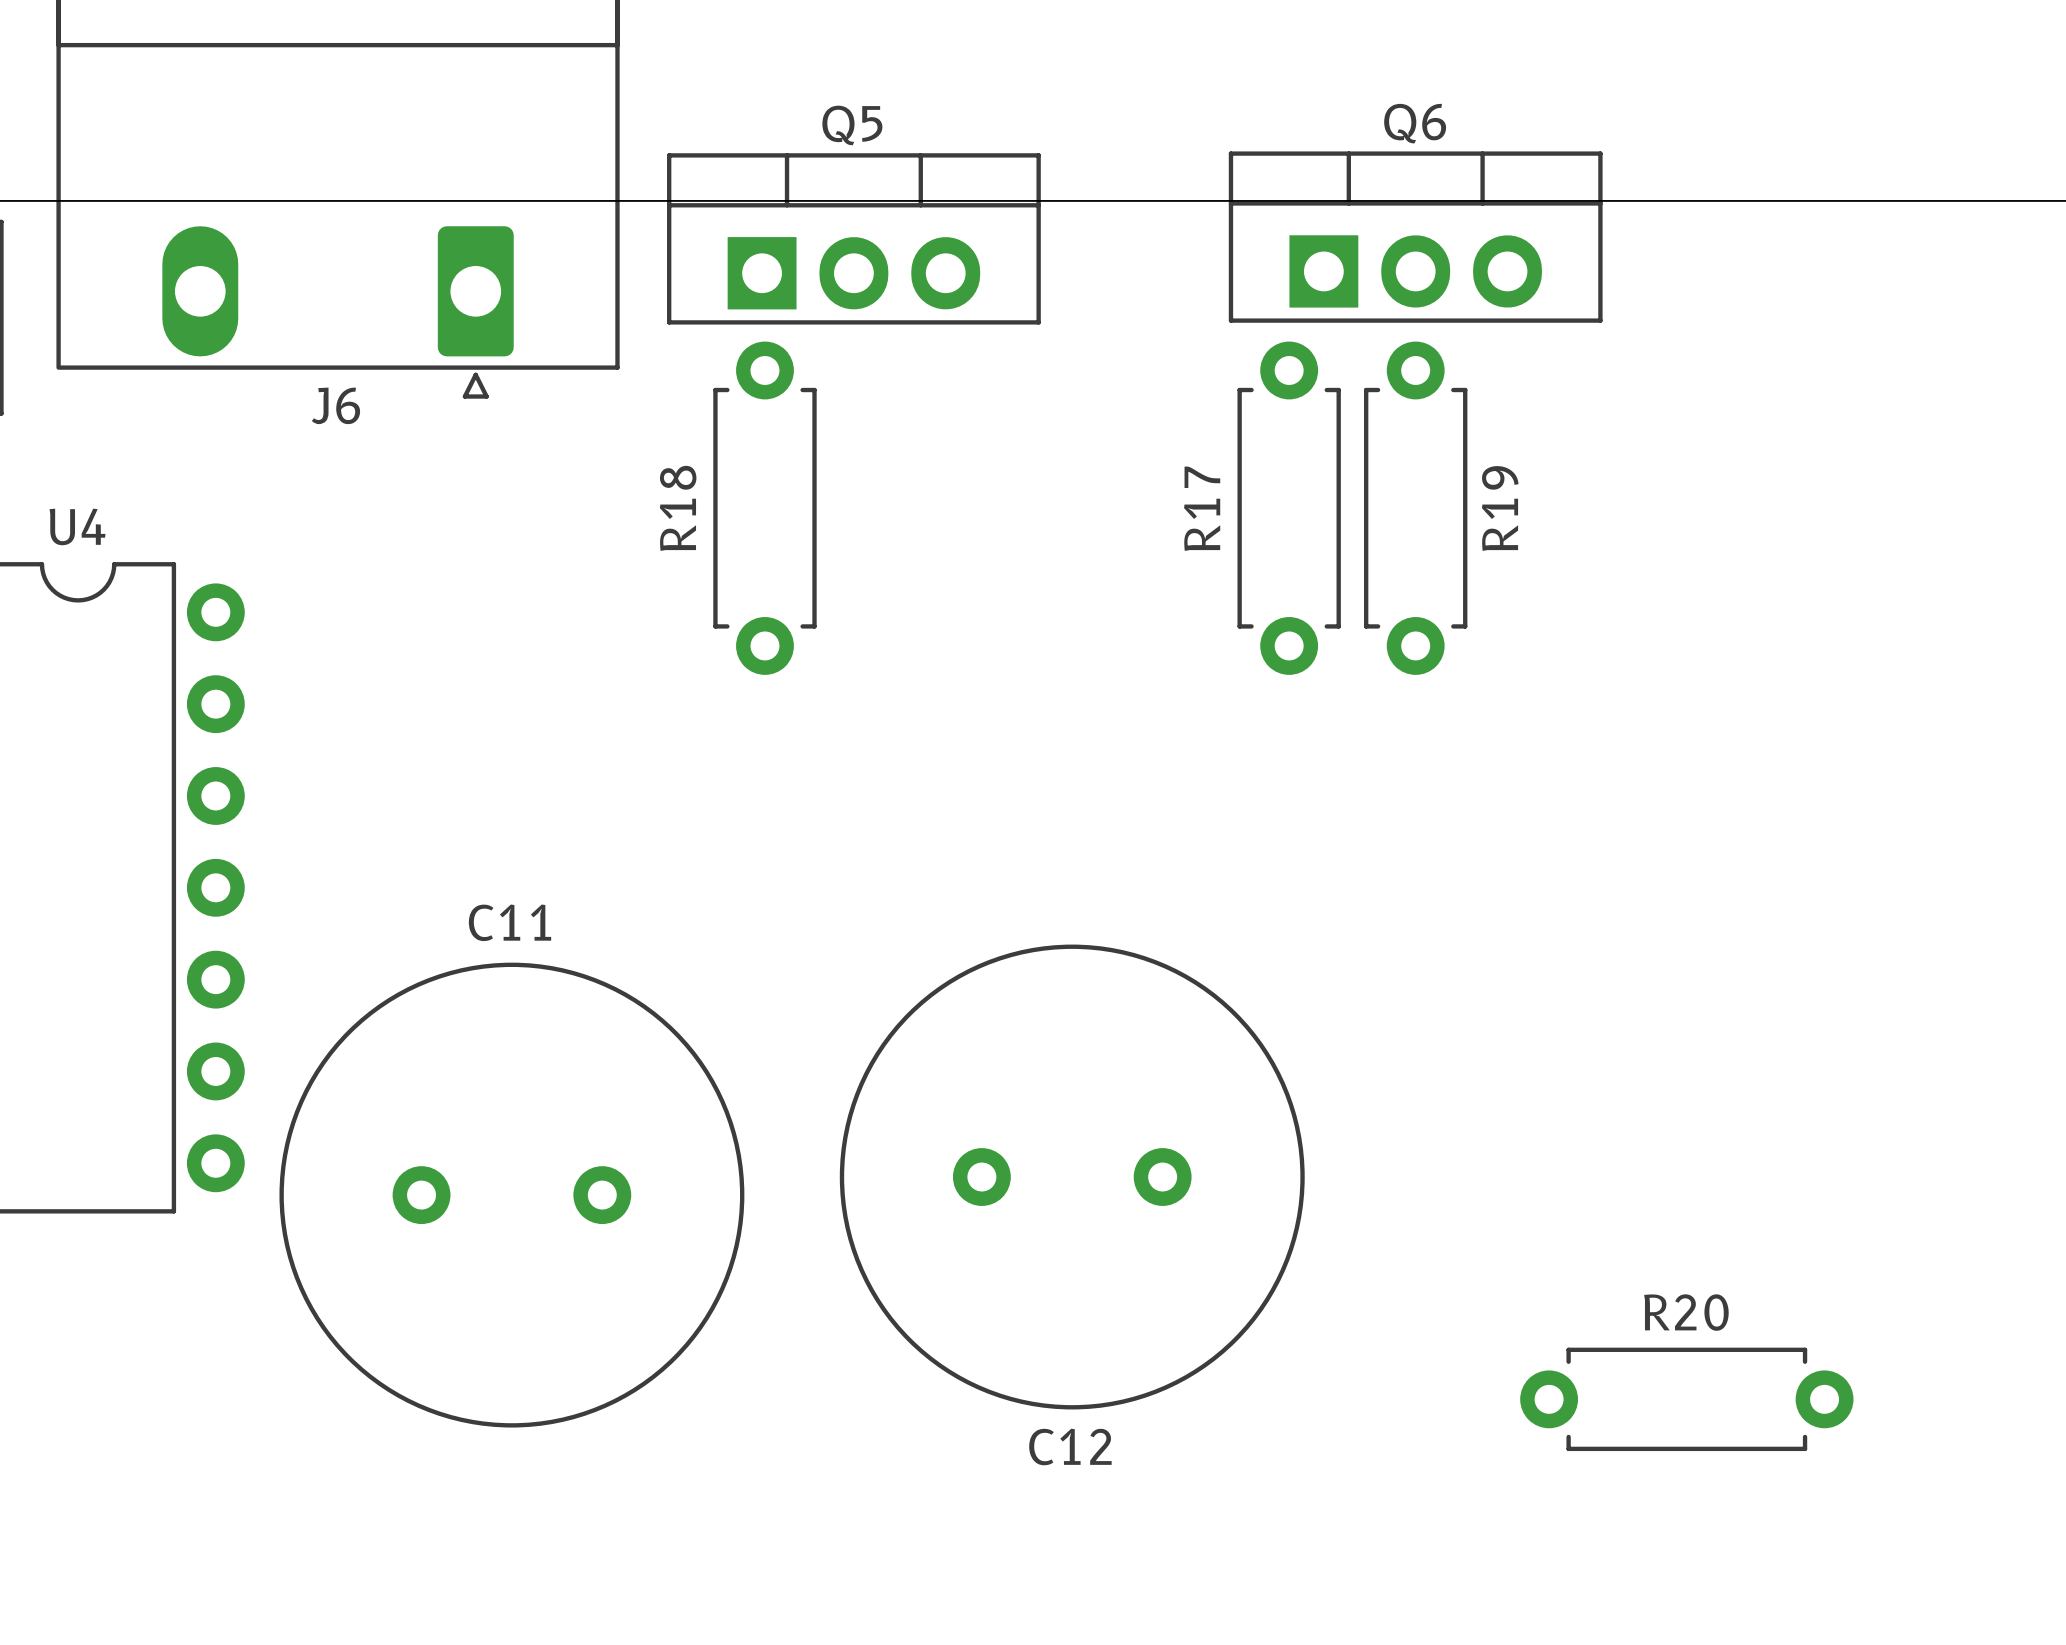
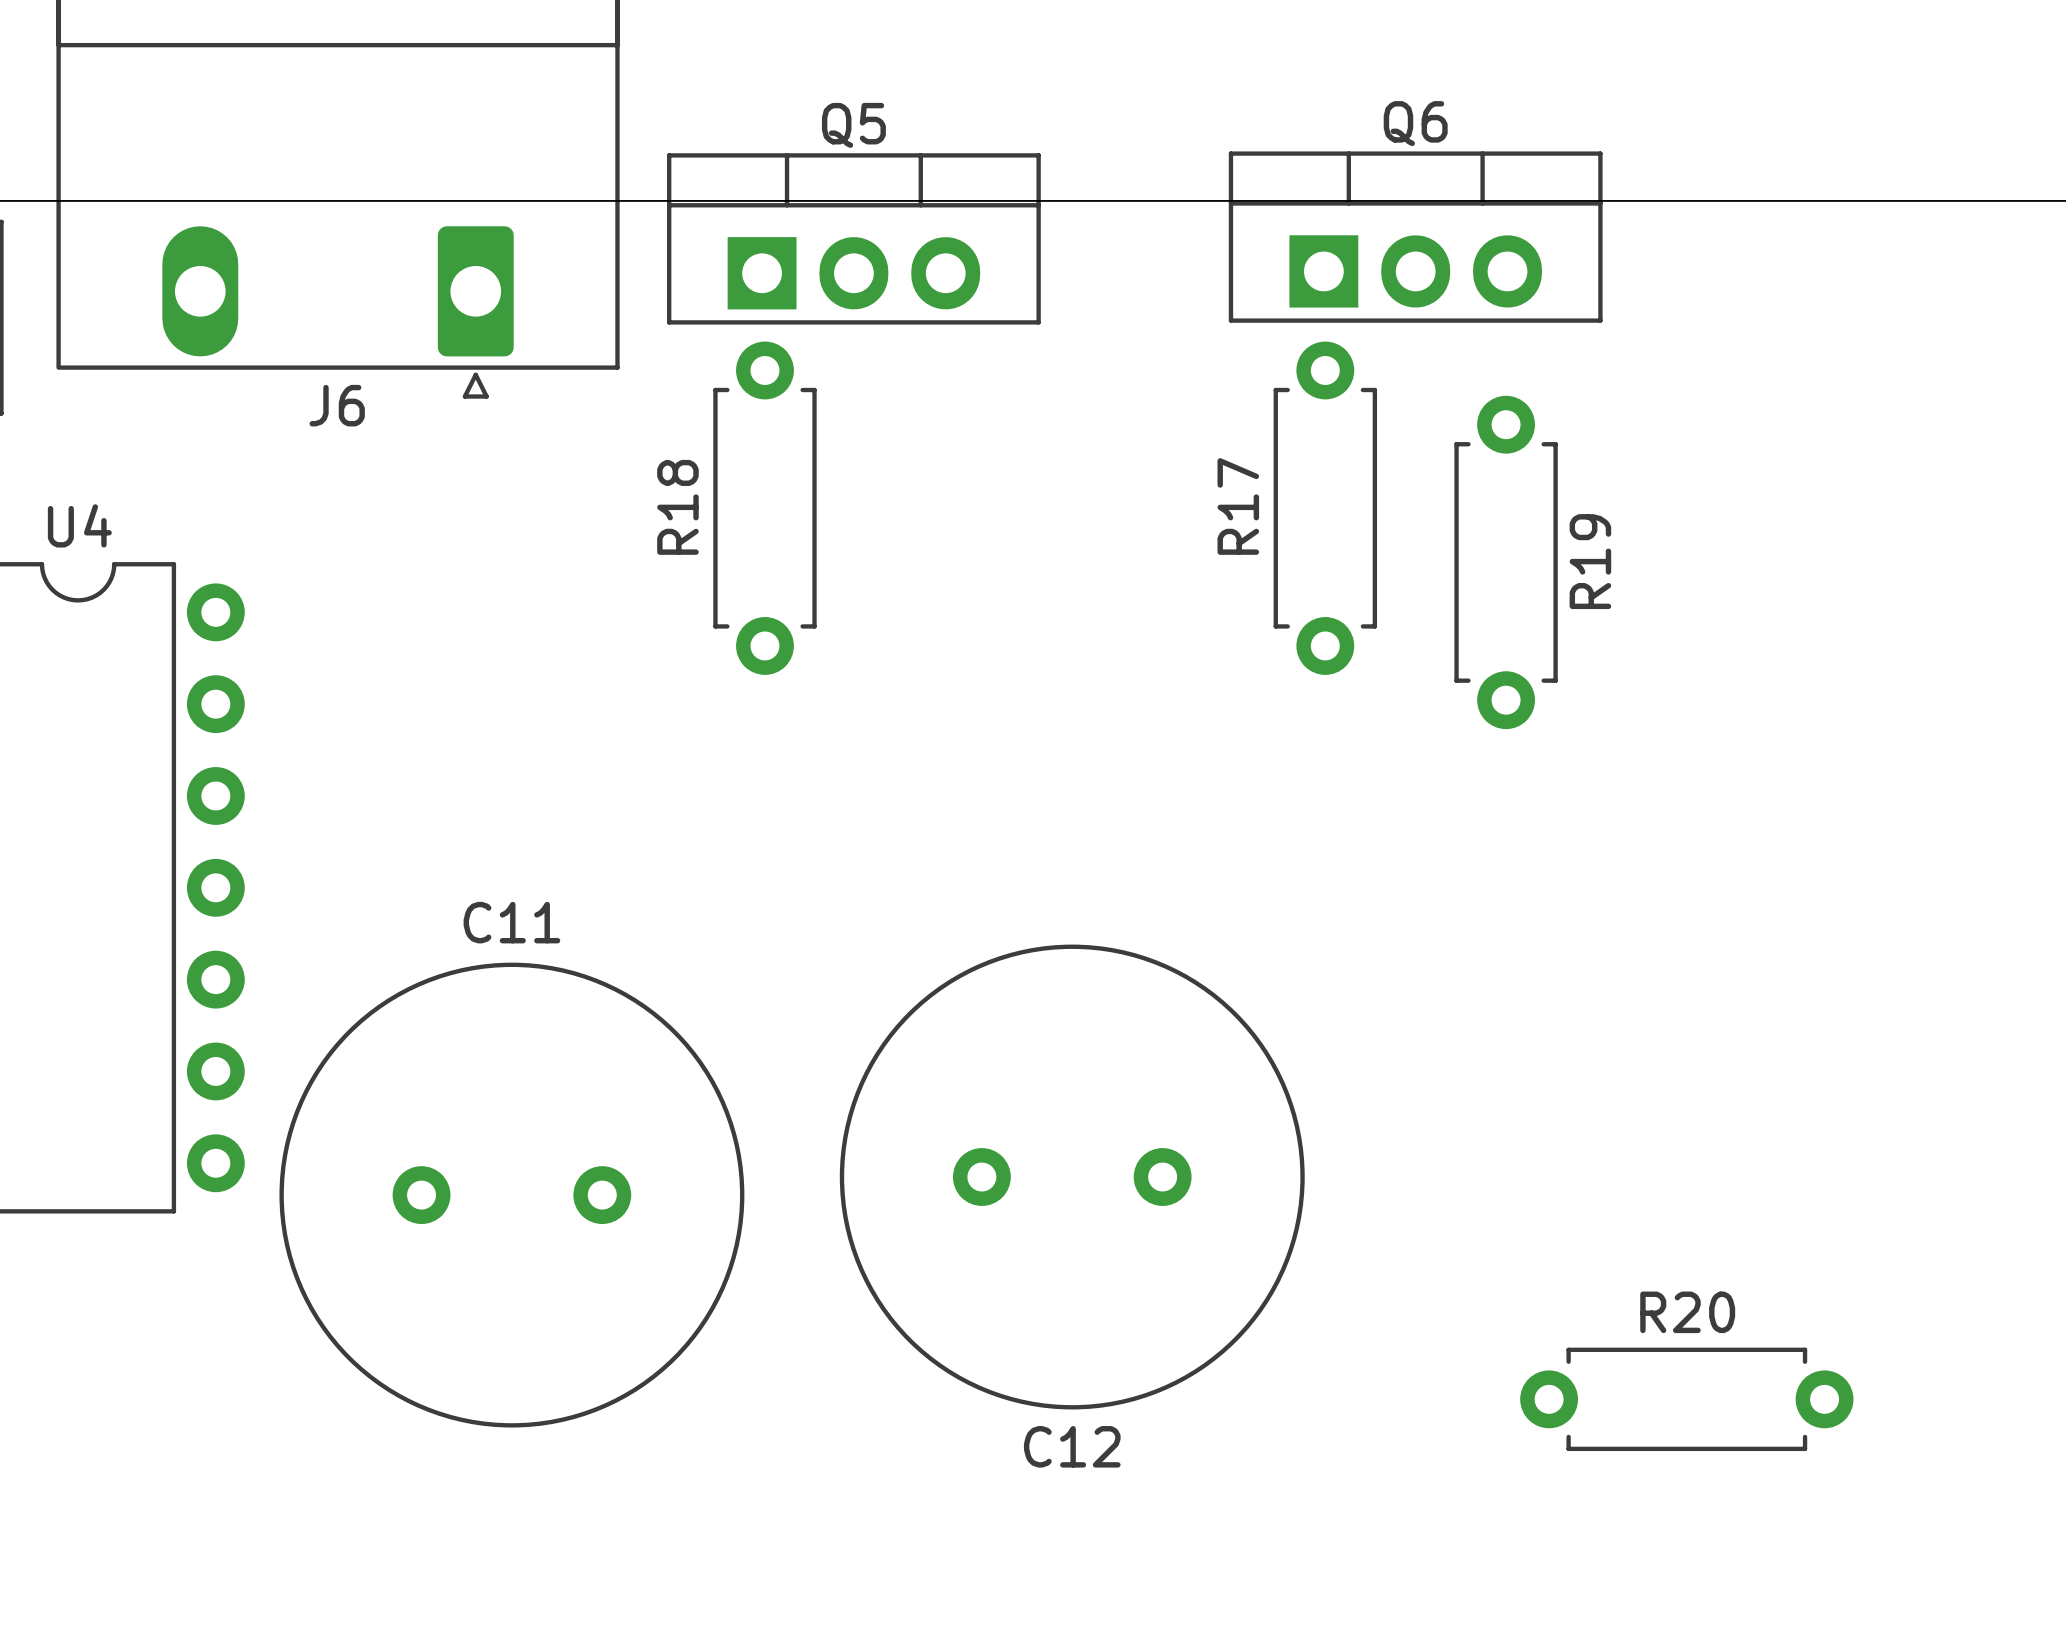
R17 position: (1289, 508) -> (1325, 508)
R19 position: (1415, 508) -> (1506, 562)

